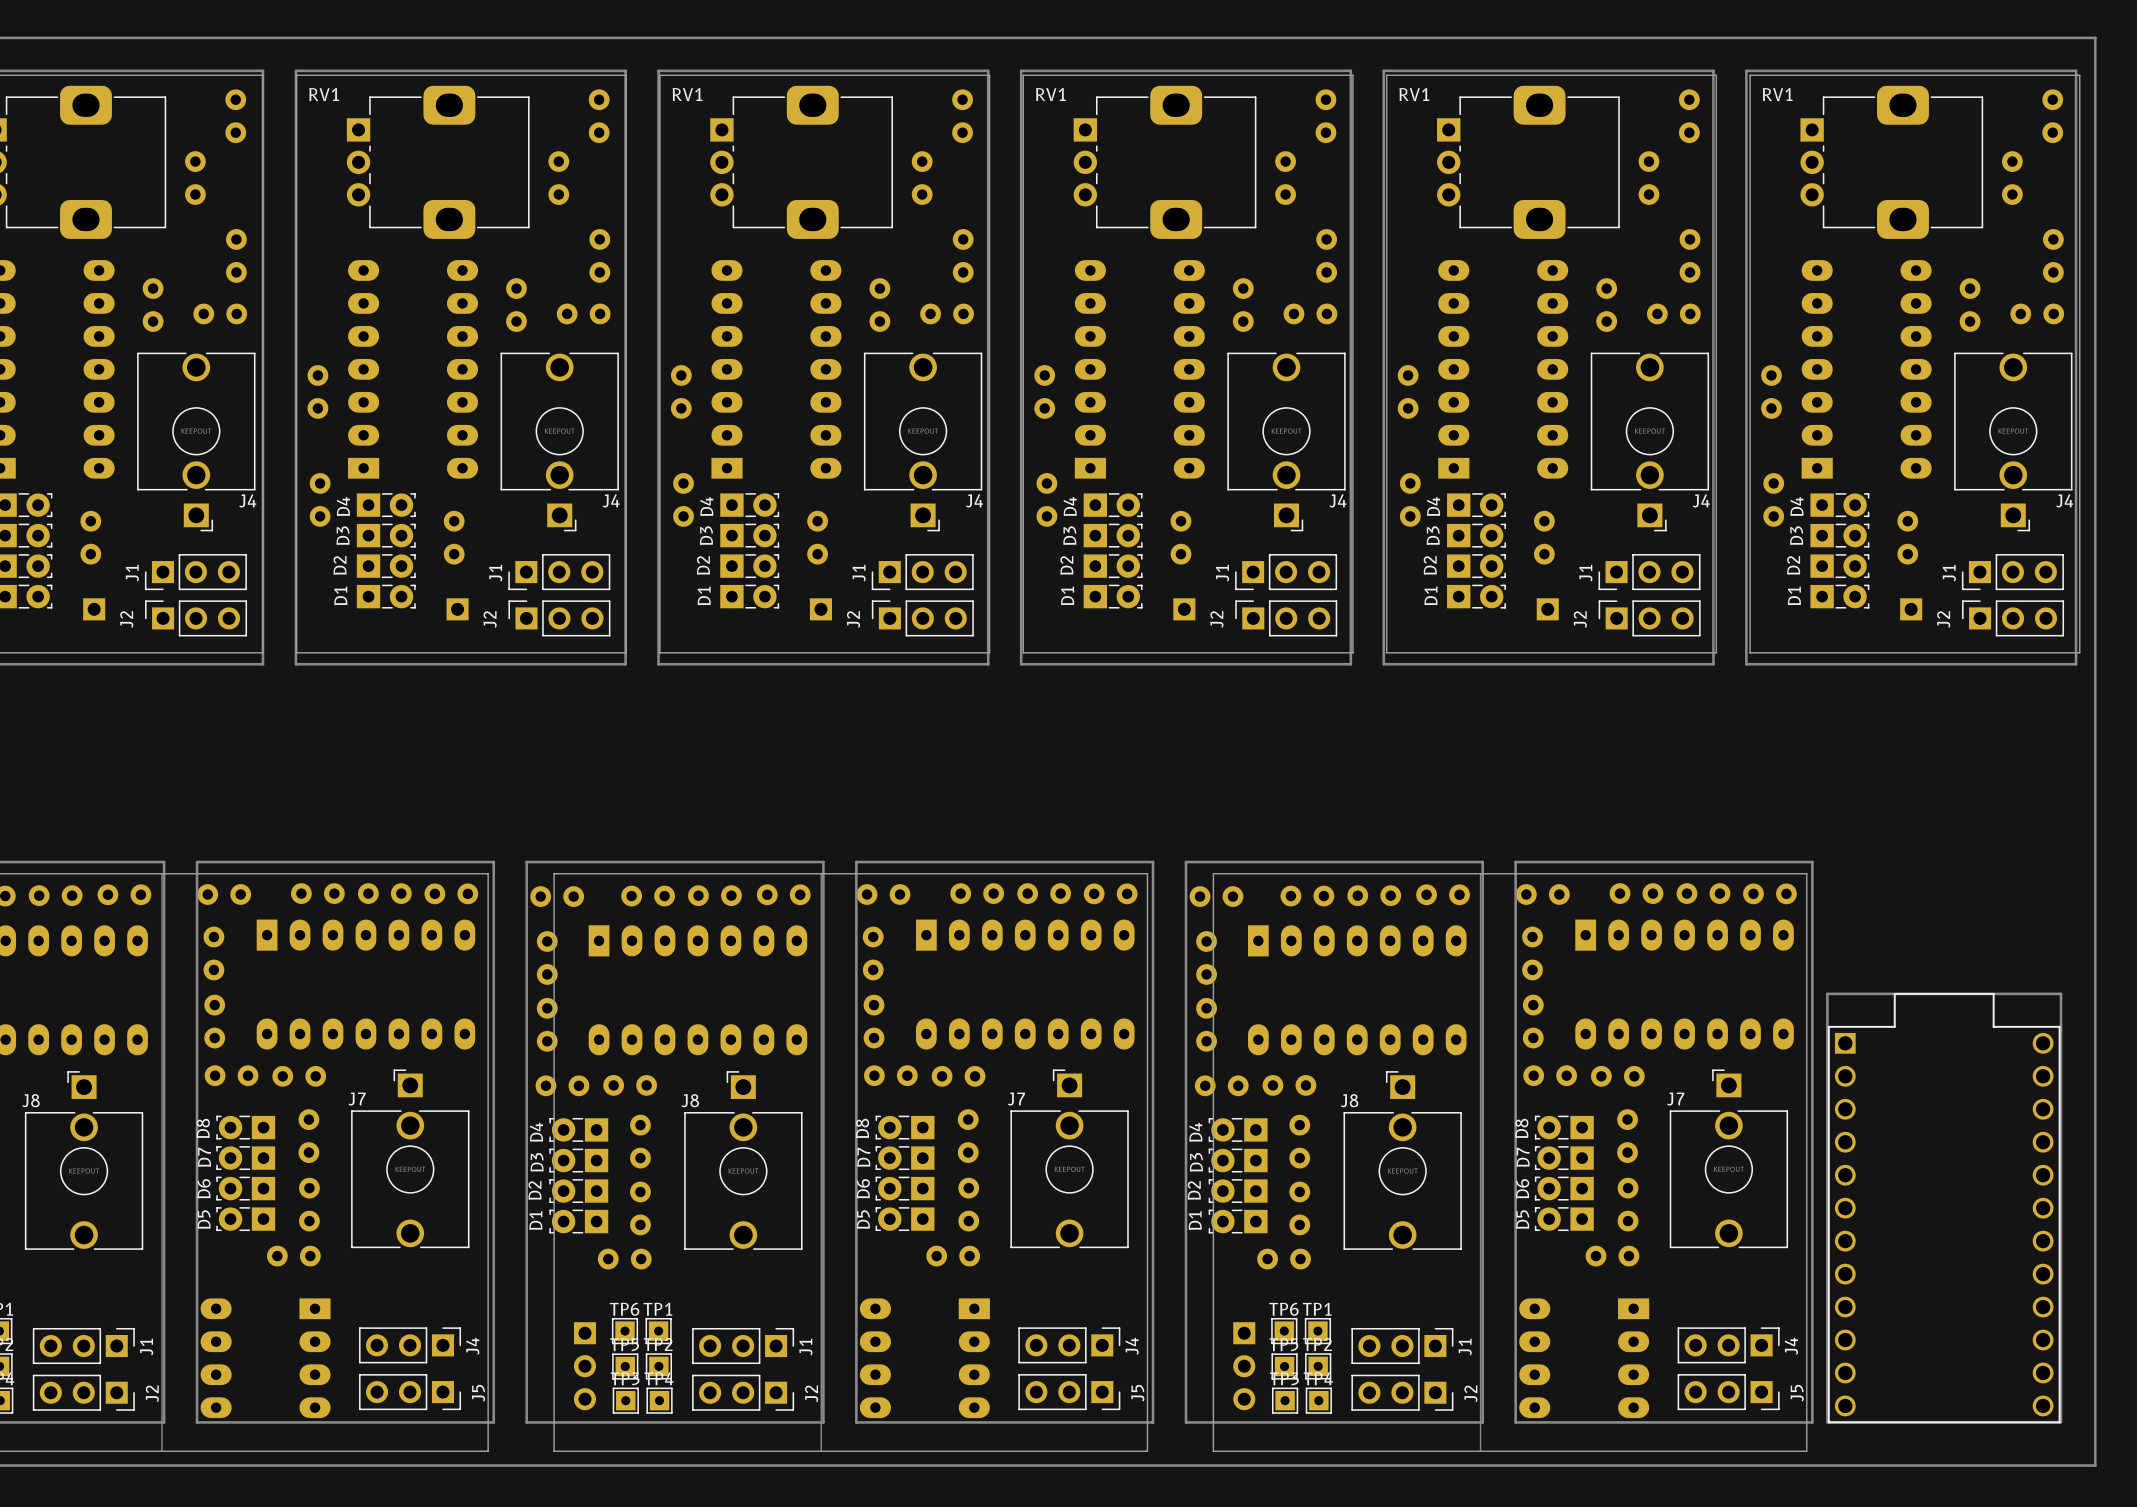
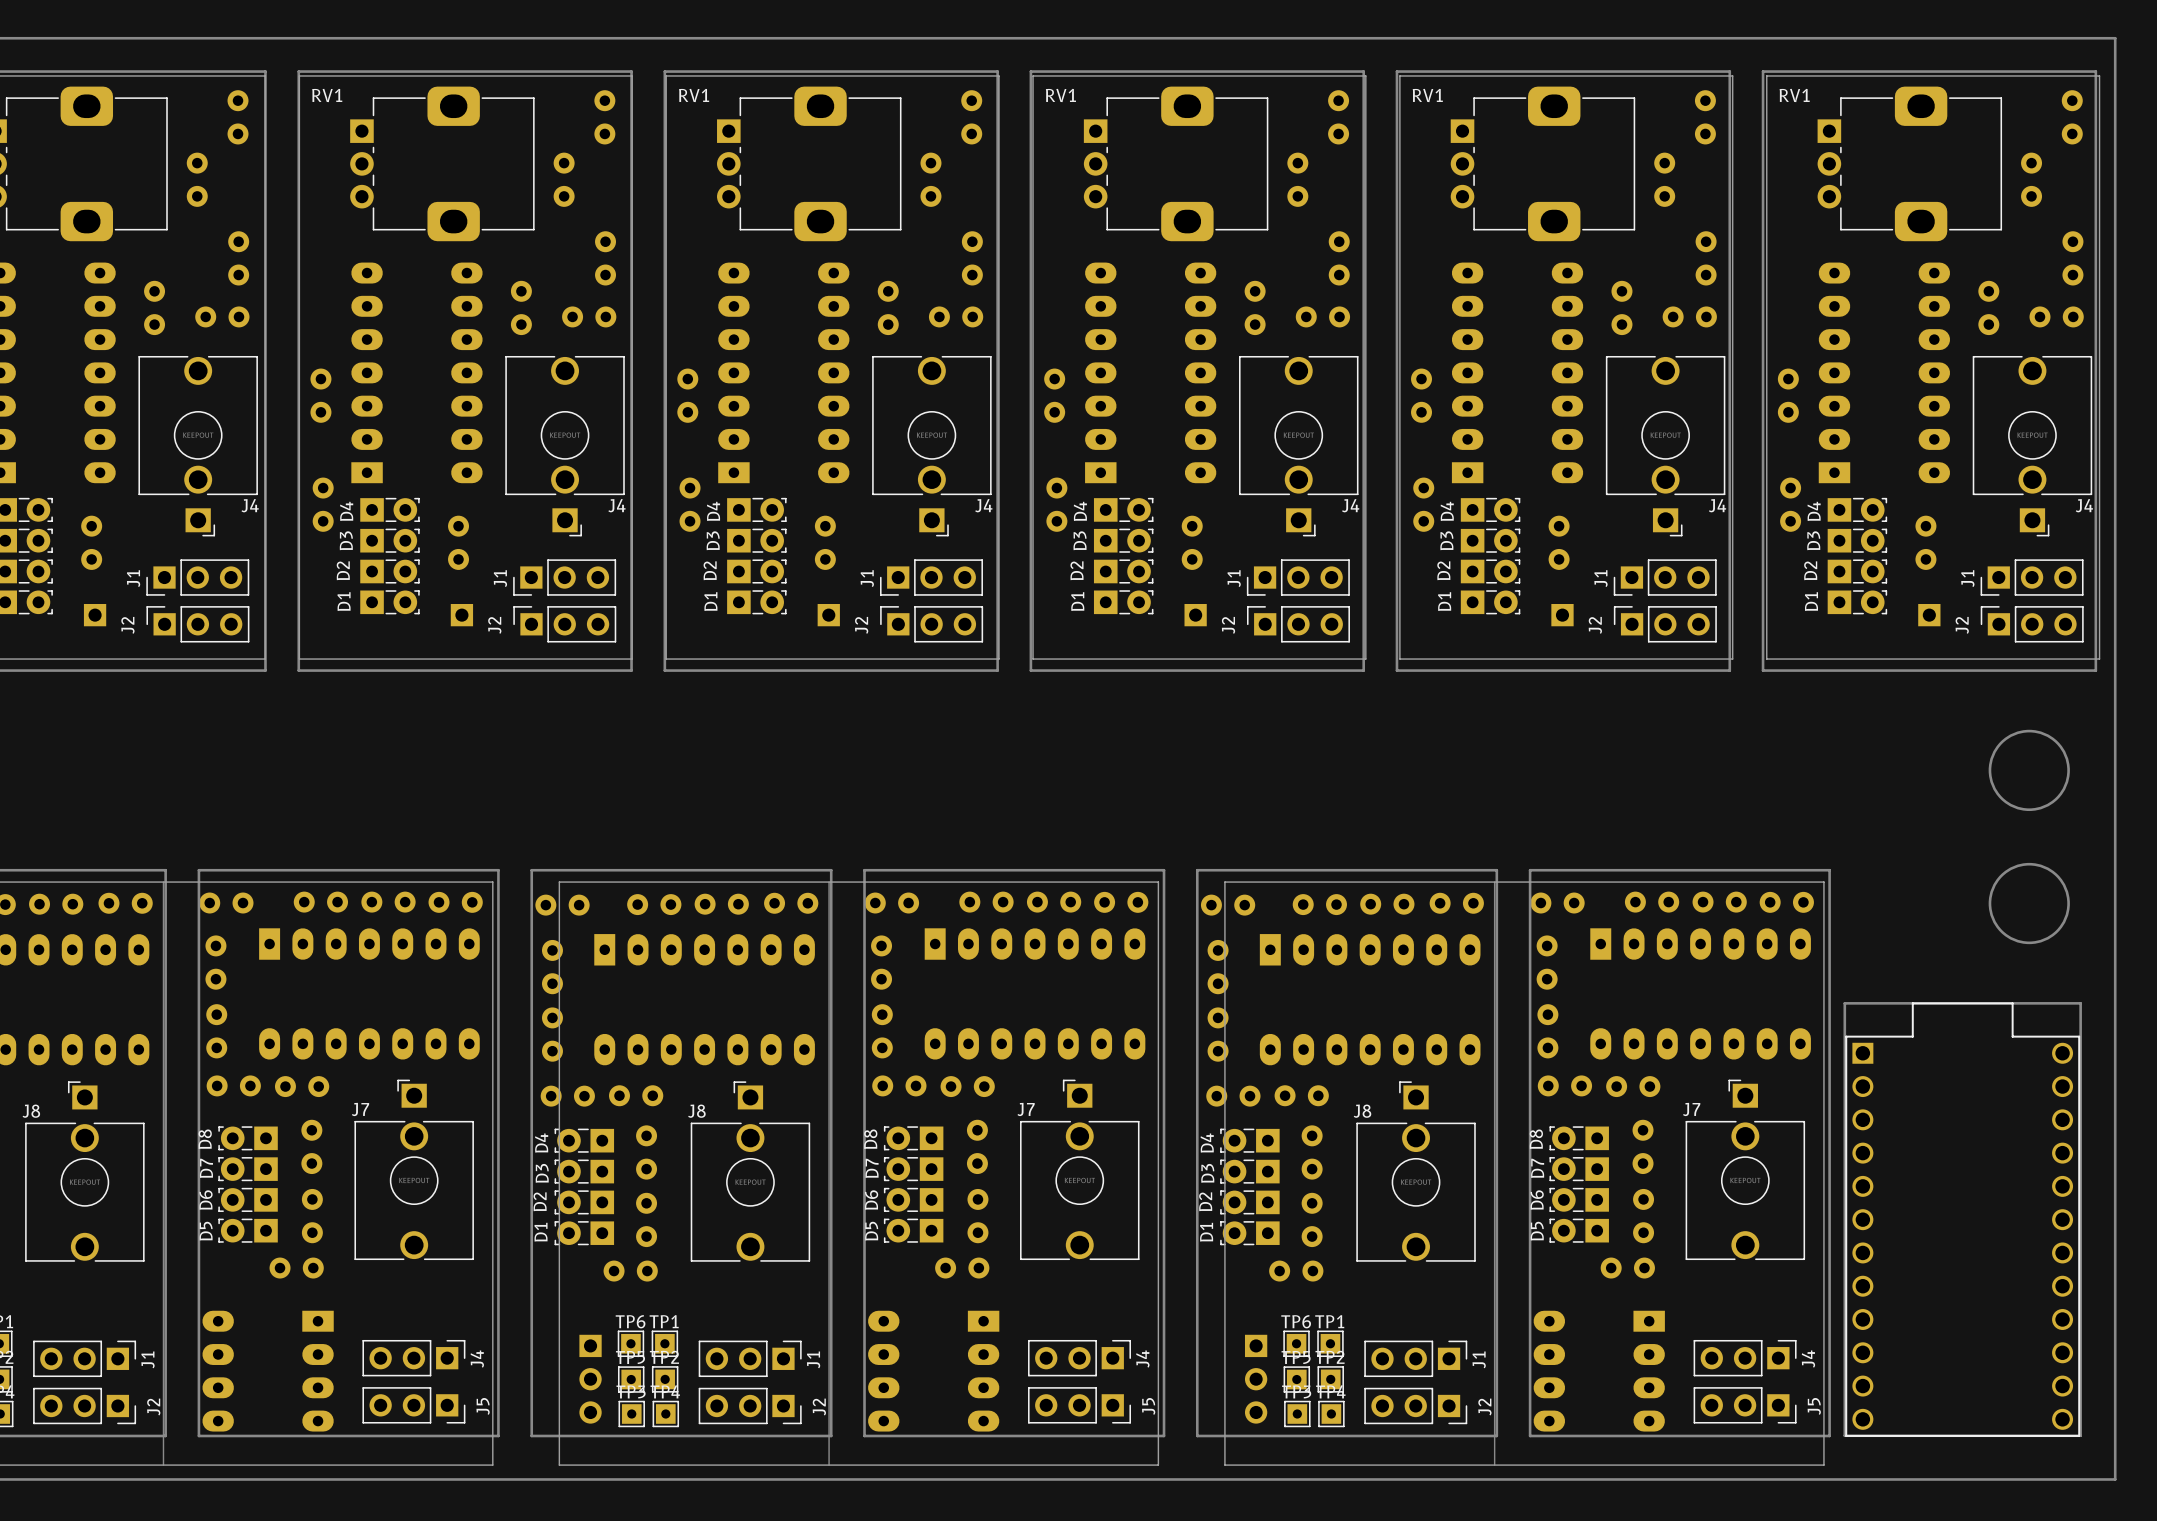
drawing: none -> [1988, 729, 2070, 812]
drawing: none -> [1988, 862, 2070, 945]

